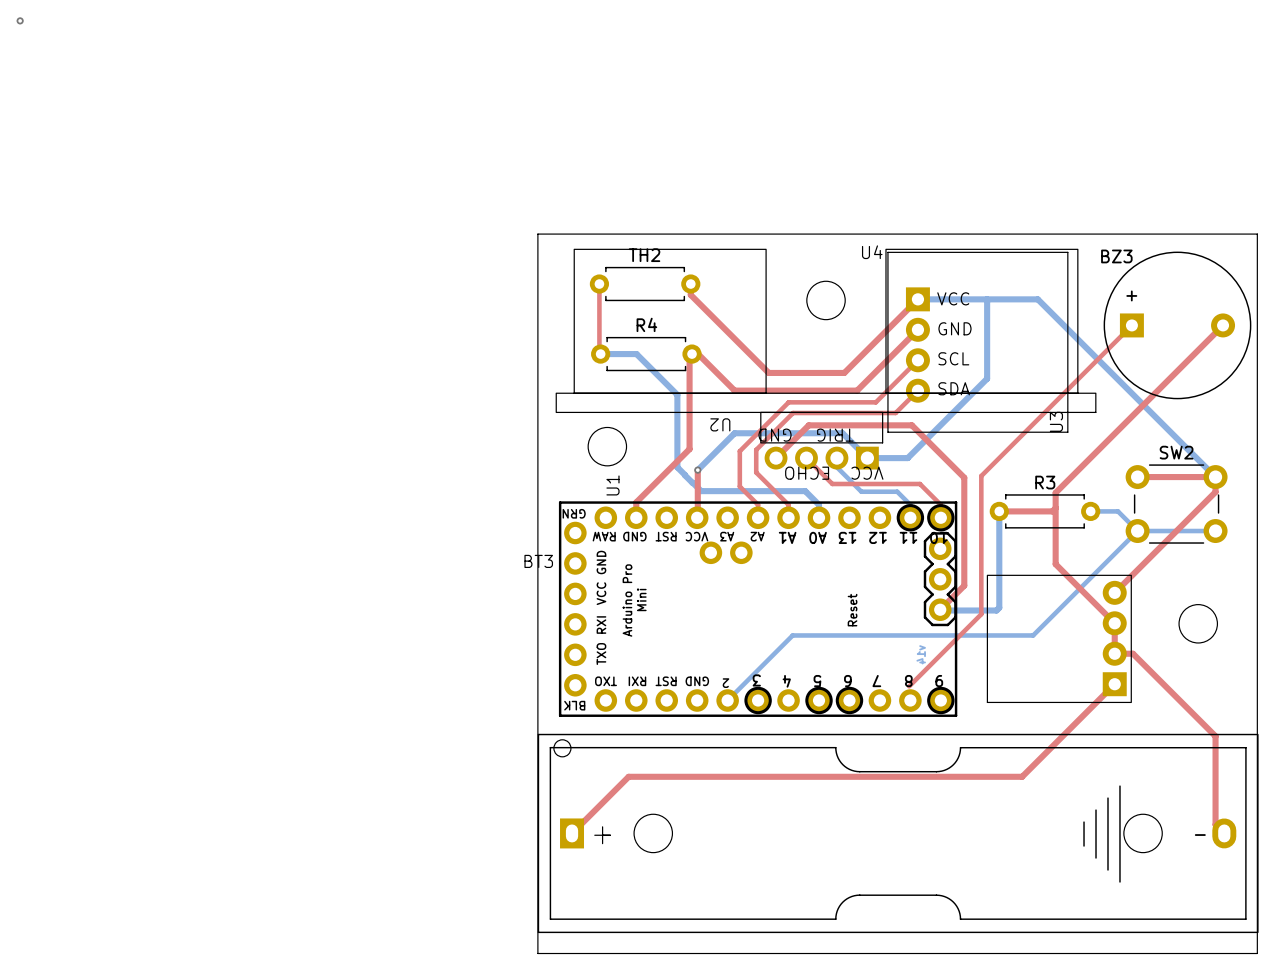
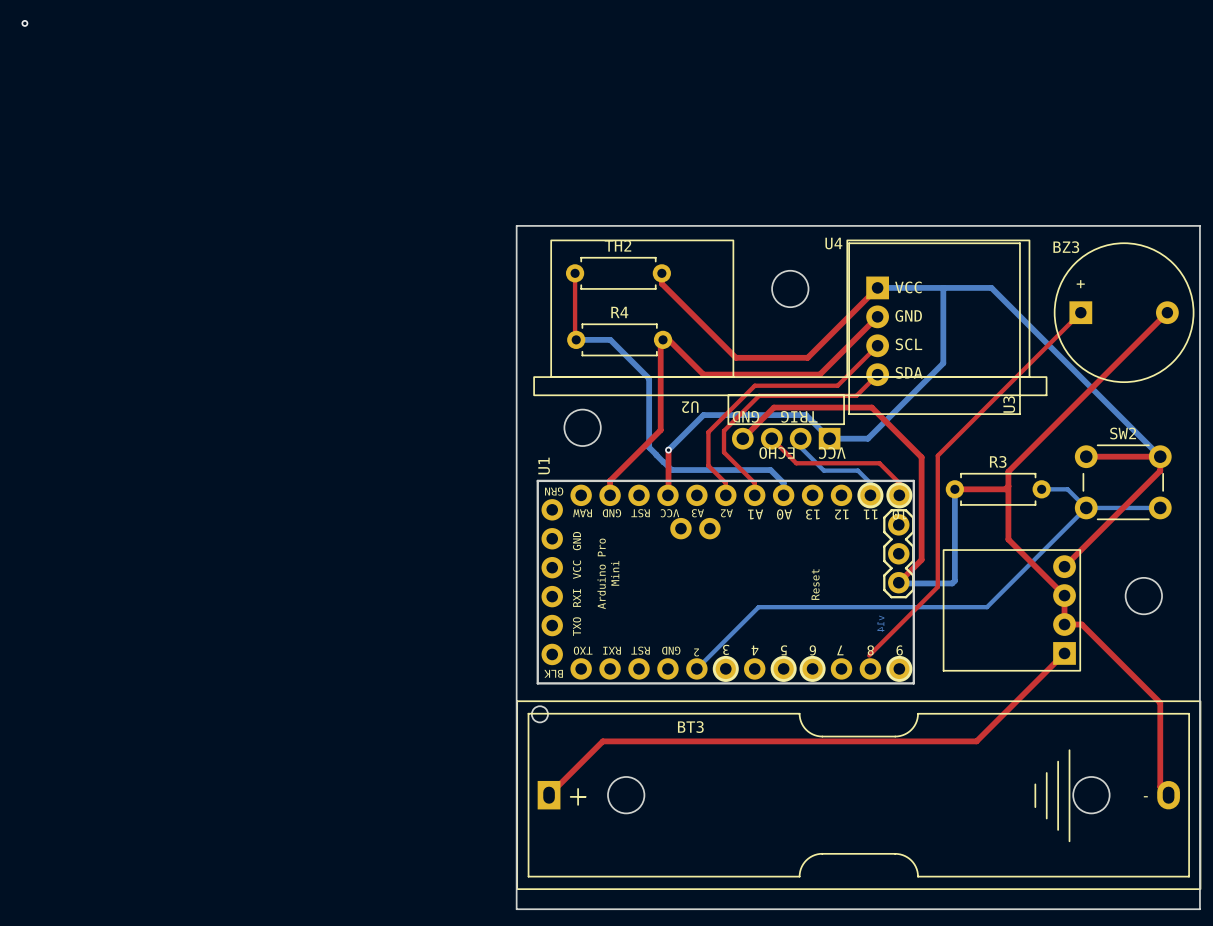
U1 name position: U1 (612, 485) -> U1 (544, 465)
BT3 name position: BT3 (538, 561) -> BT3 (690, 727)

